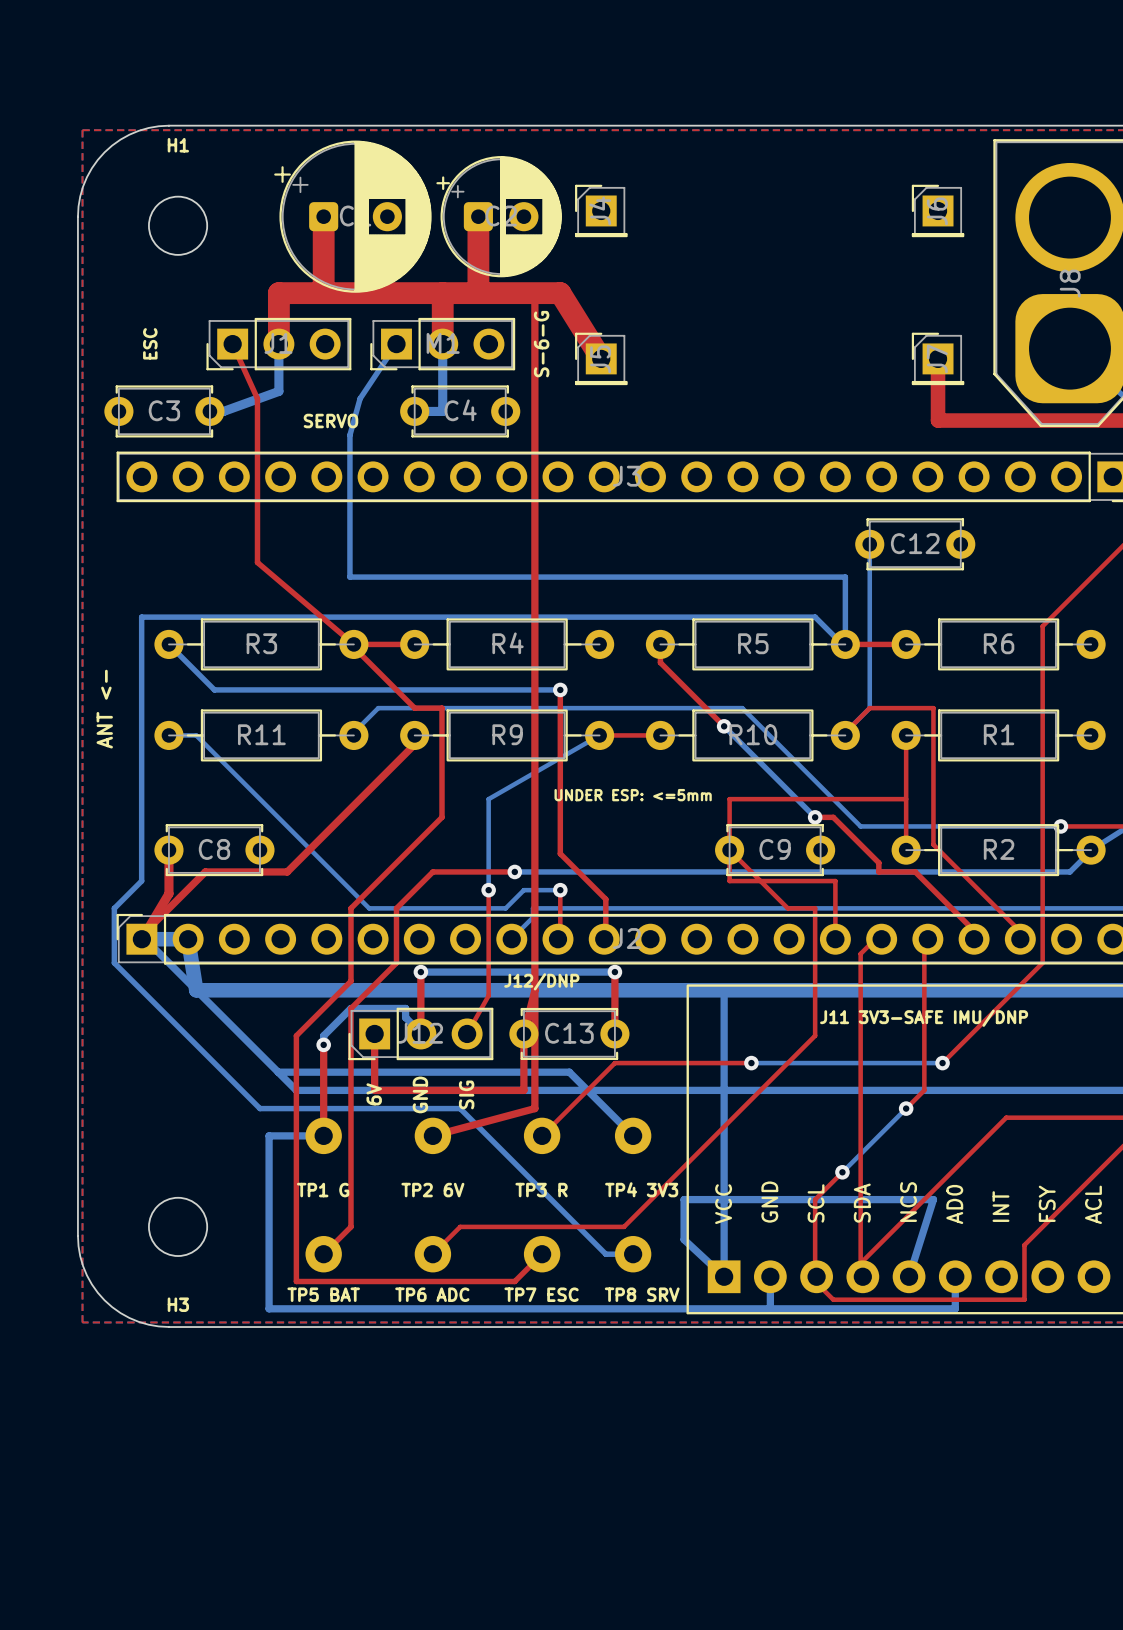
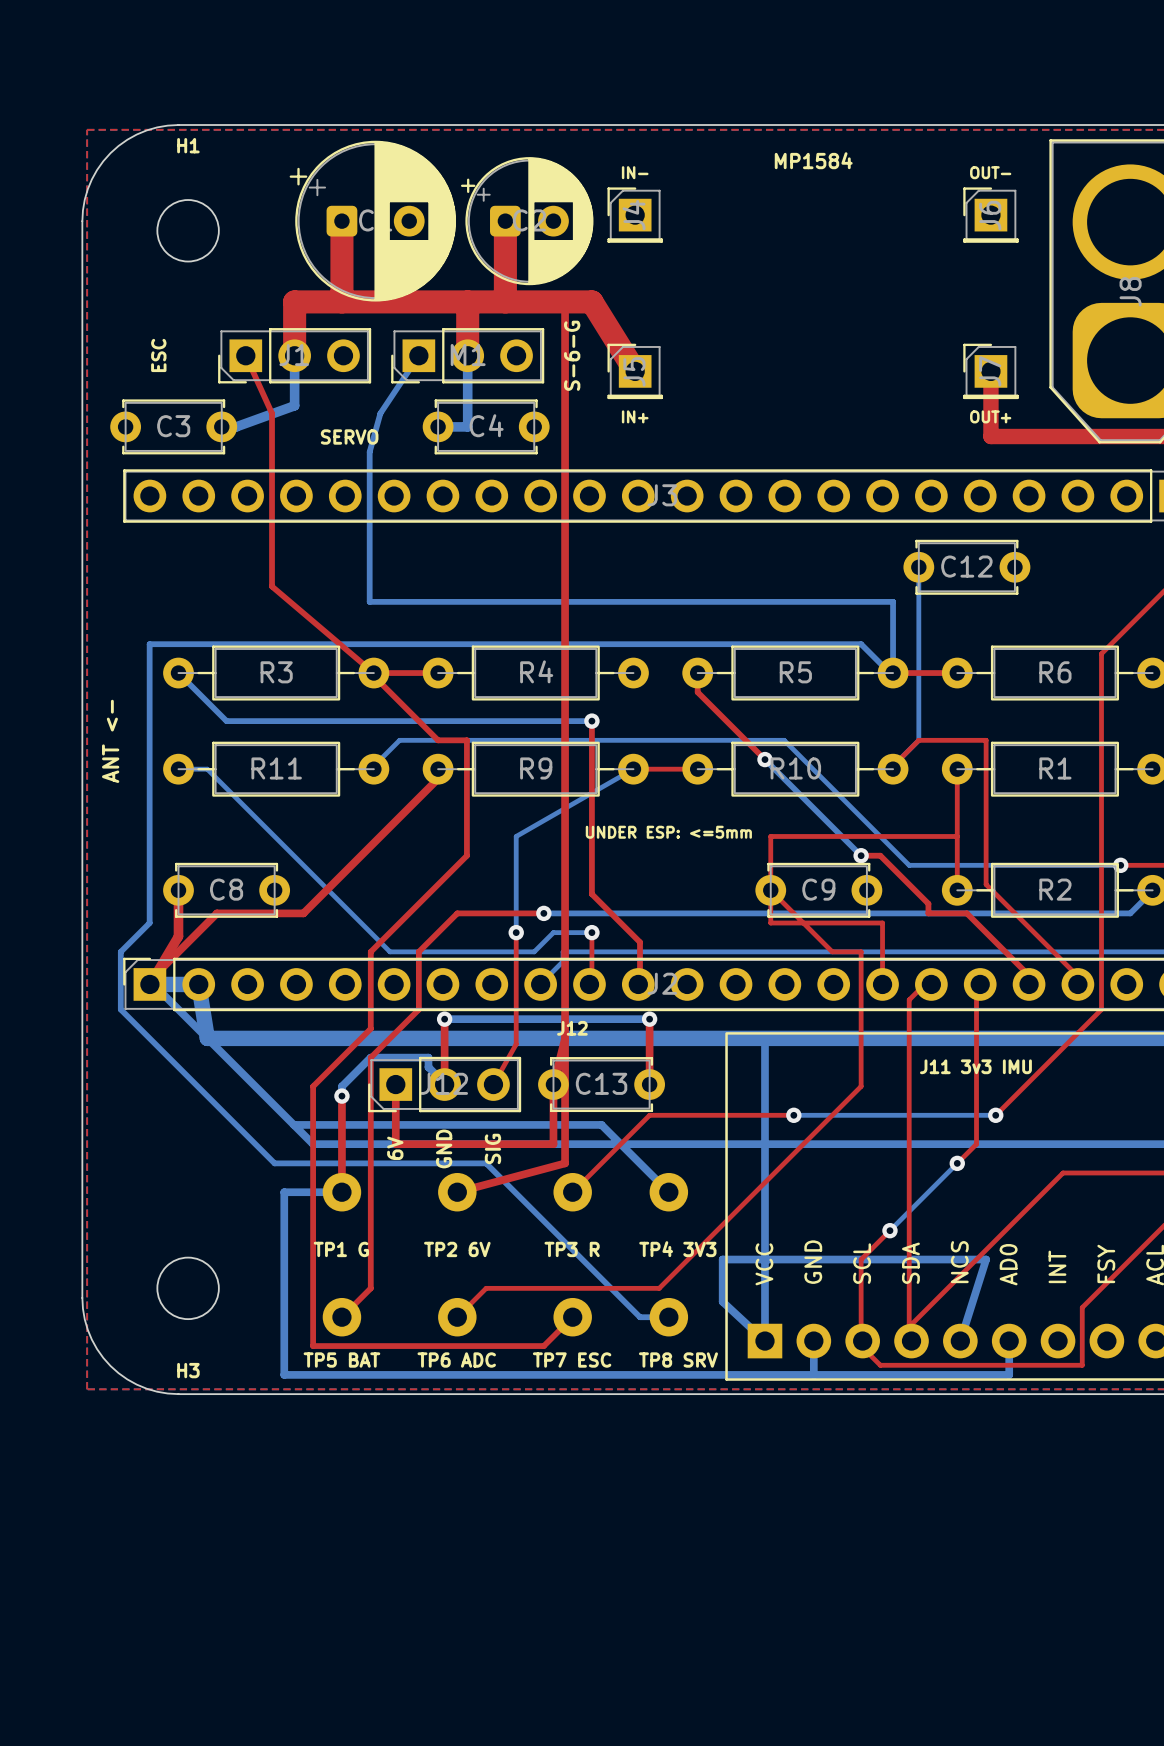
text: none -> MP1584 (813, 160)
text: none -> IN- (635, 172)
text: none -> OUT- (990, 172)
text: none -> IN+ (635, 416)
text: none -> OUT+ (990, 416)
text: J12/DNP (541, 981) -> J12 (572, 1028)
text: J11 3V3-SAFE IMU/DNP (924, 1018) -> J11 3v3 IMU (975, 1066)

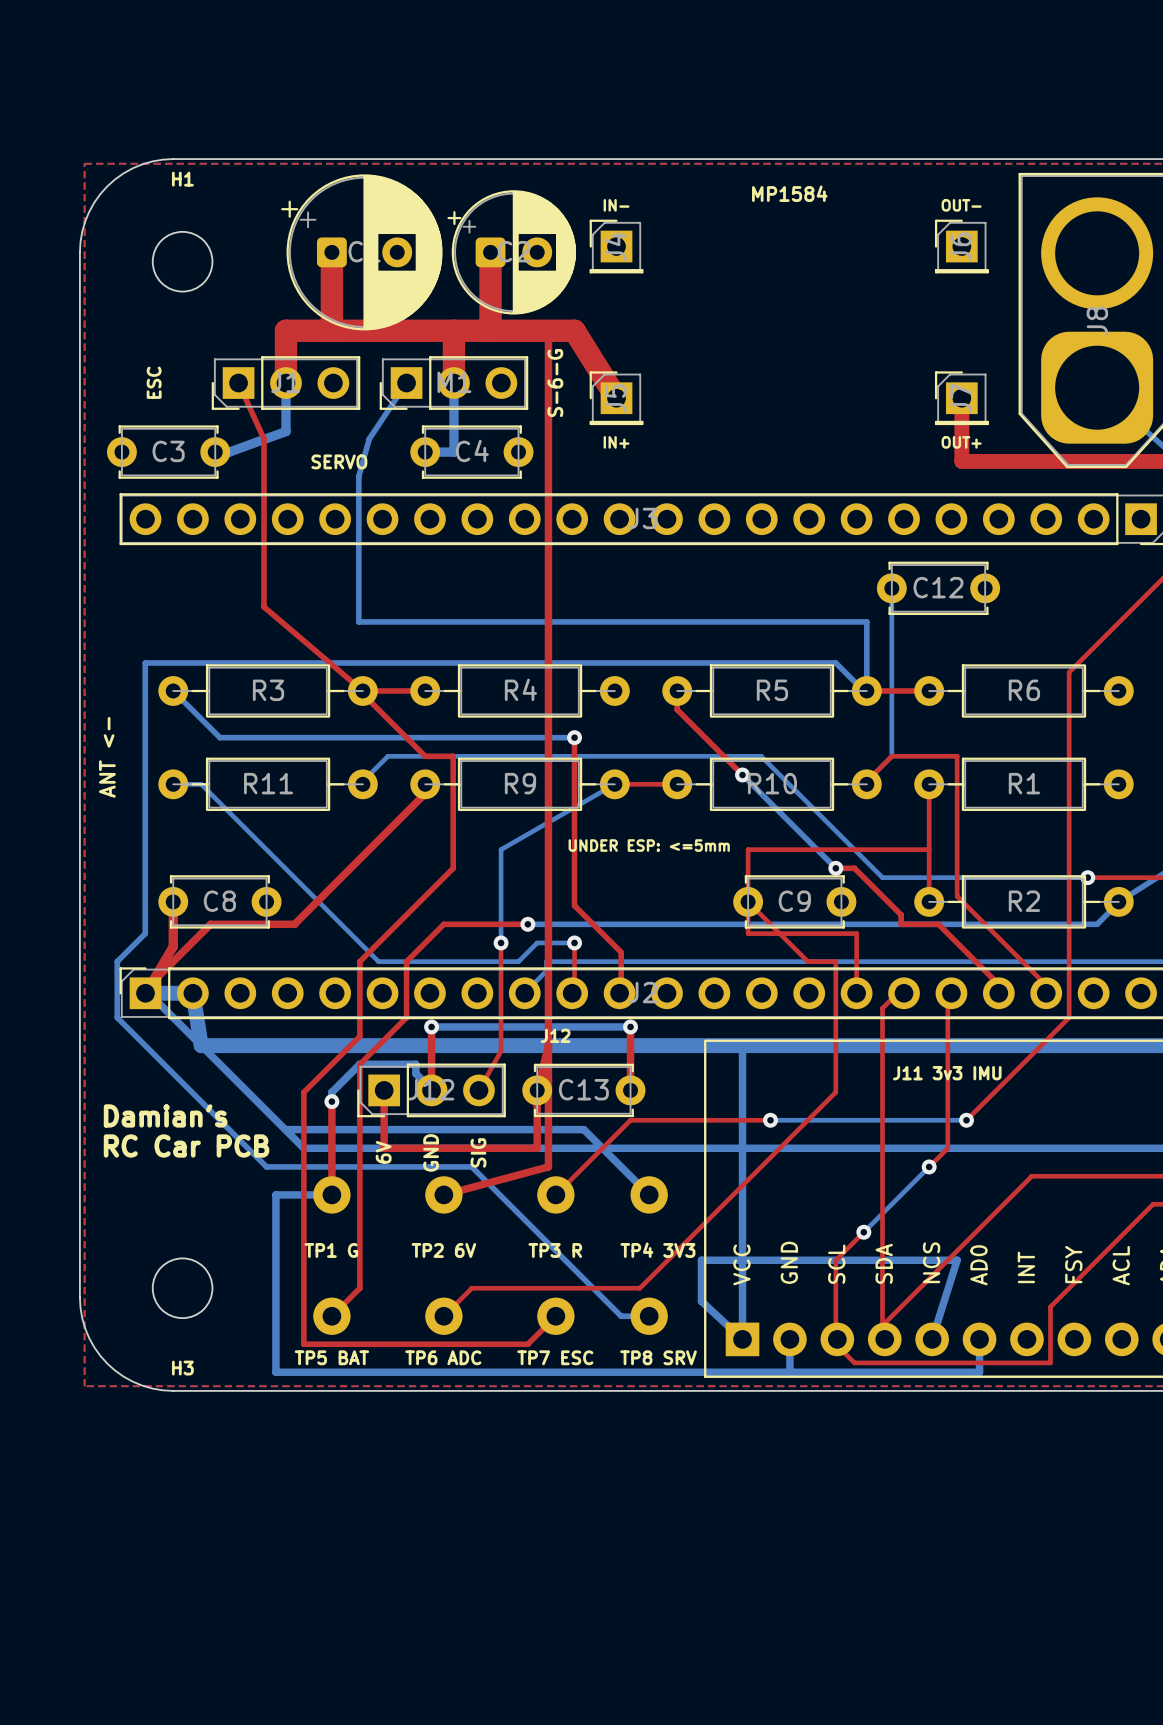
text: none -> Damian's (165, 1115)
text: none -> RC Car PCB (186, 1145)

